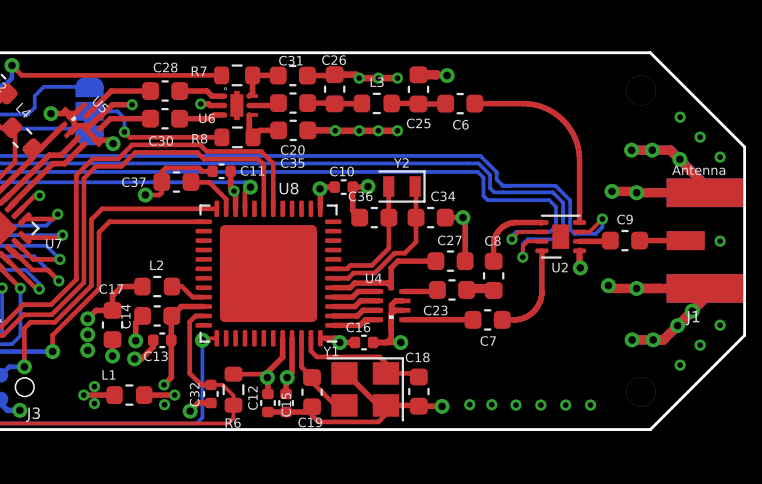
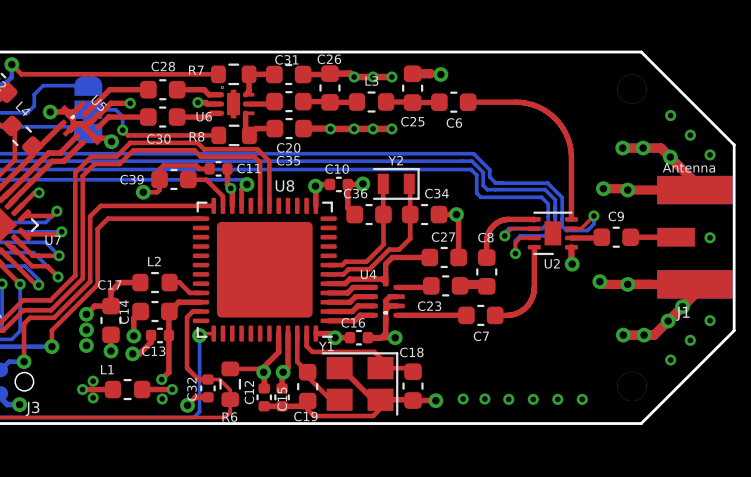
C37 name: C37 (133, 182) -> C39 (132, 179)

